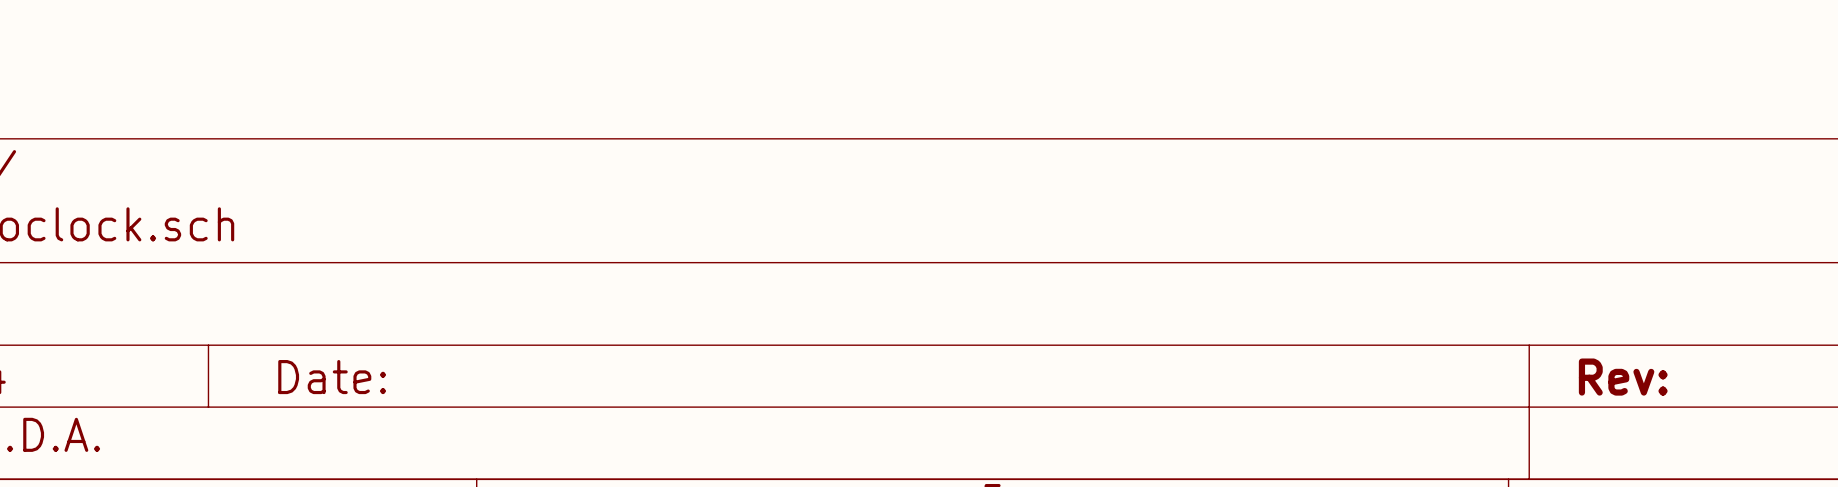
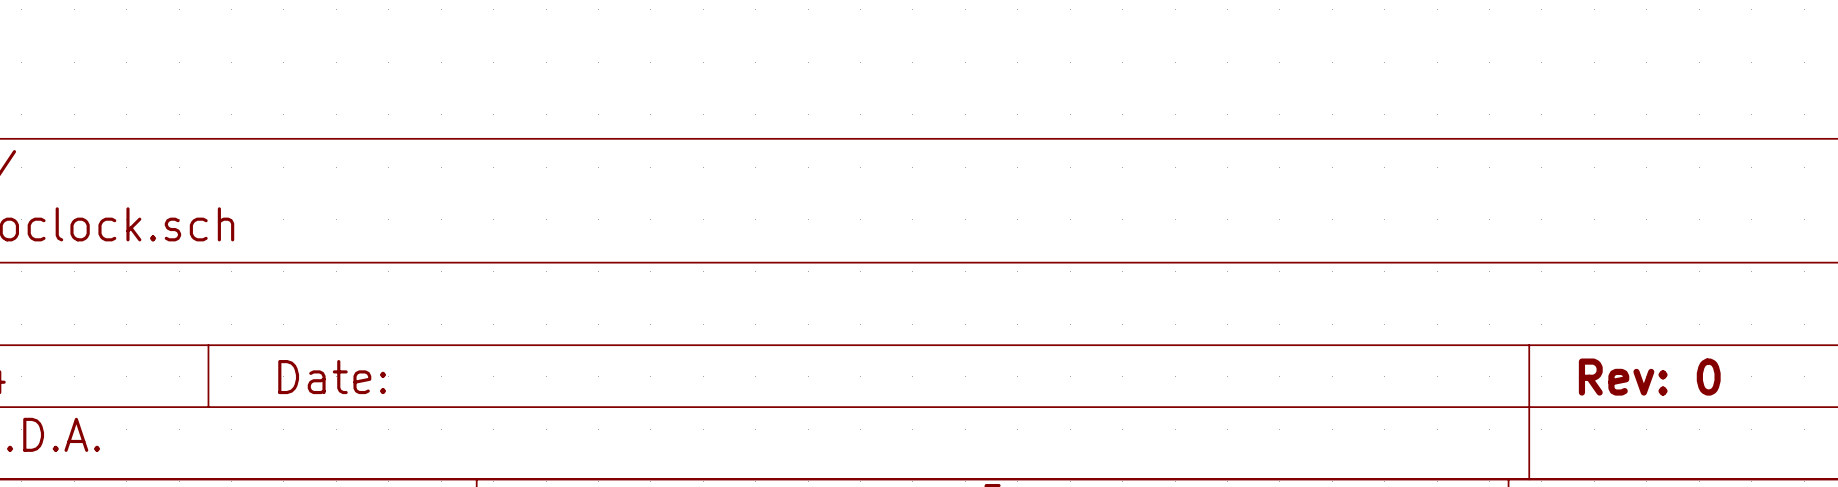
title block: Rev: (1623, 377) -> Rev: 0 (1649, 377)

